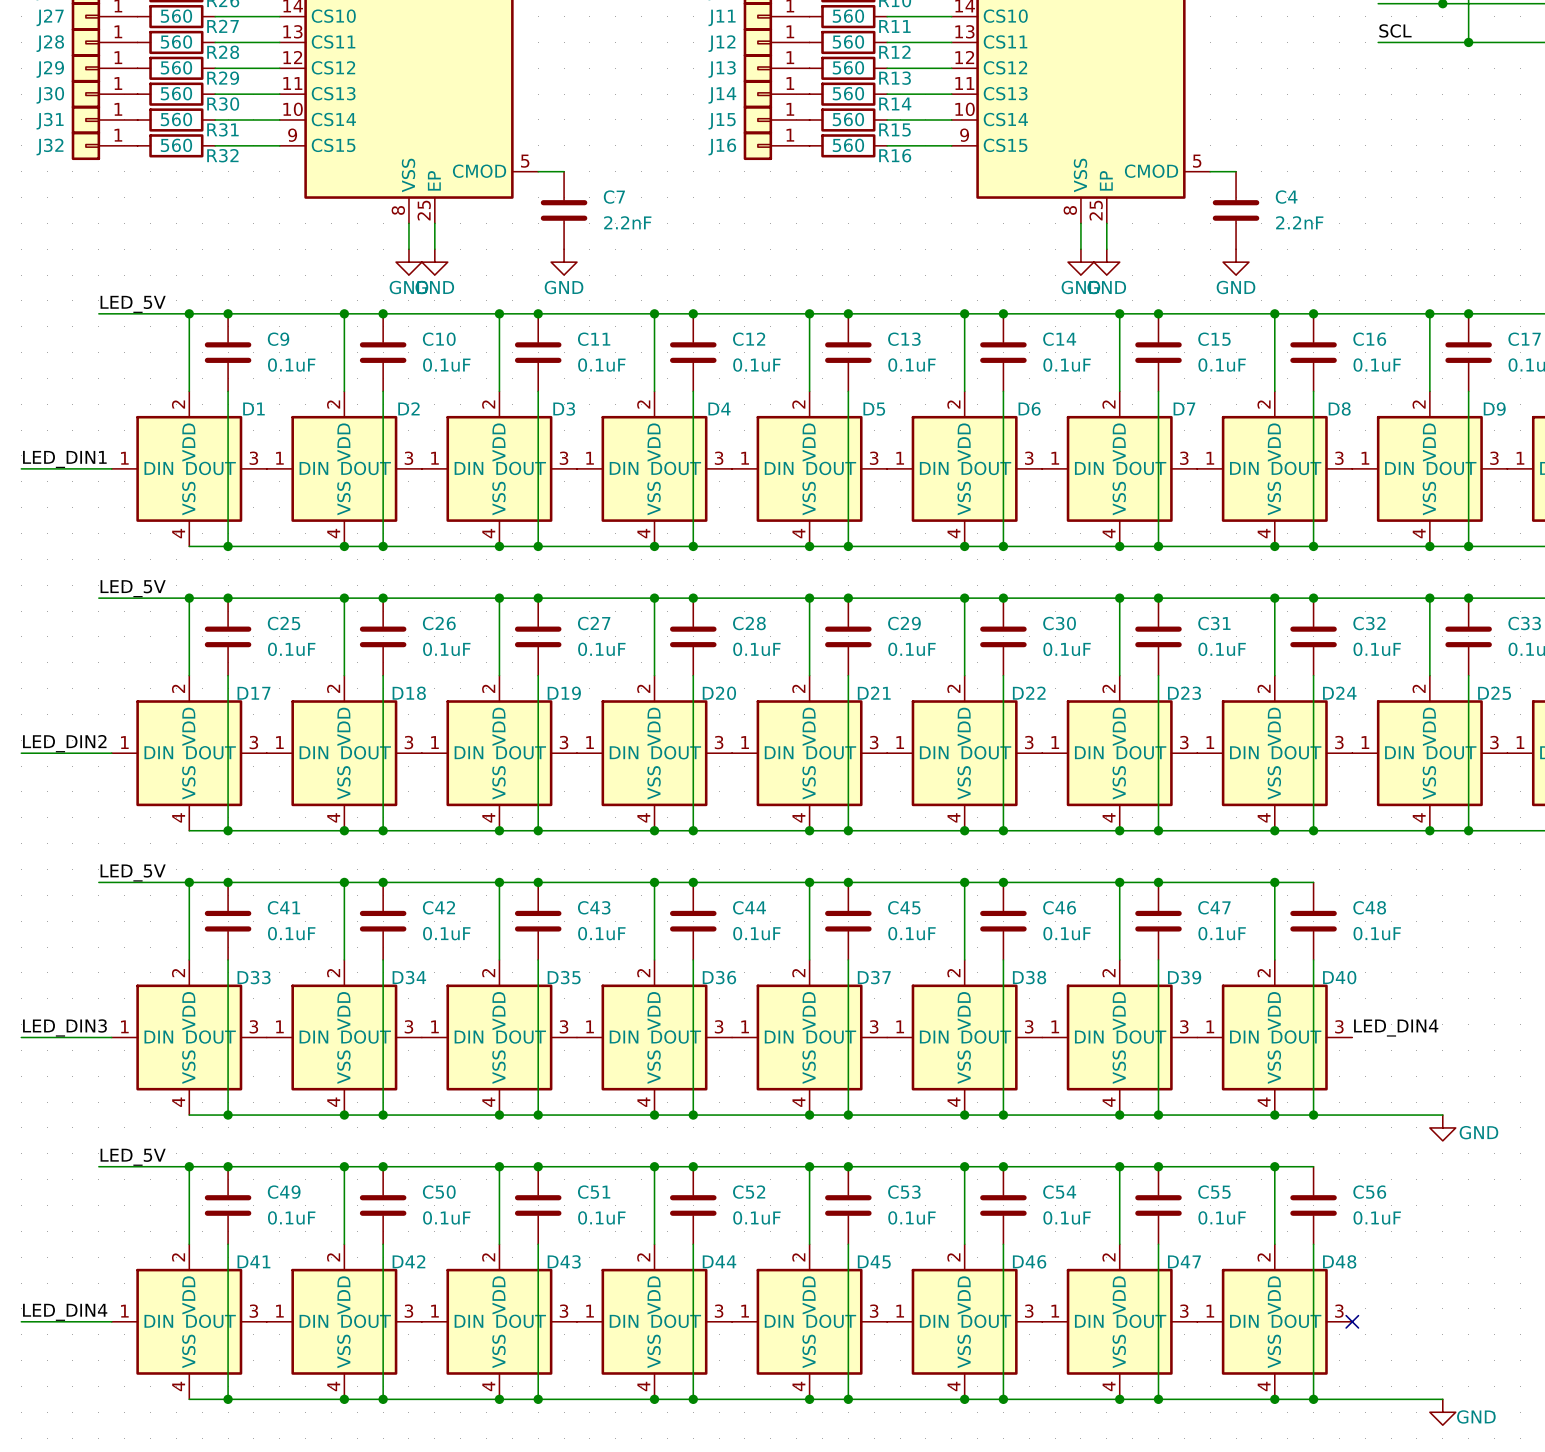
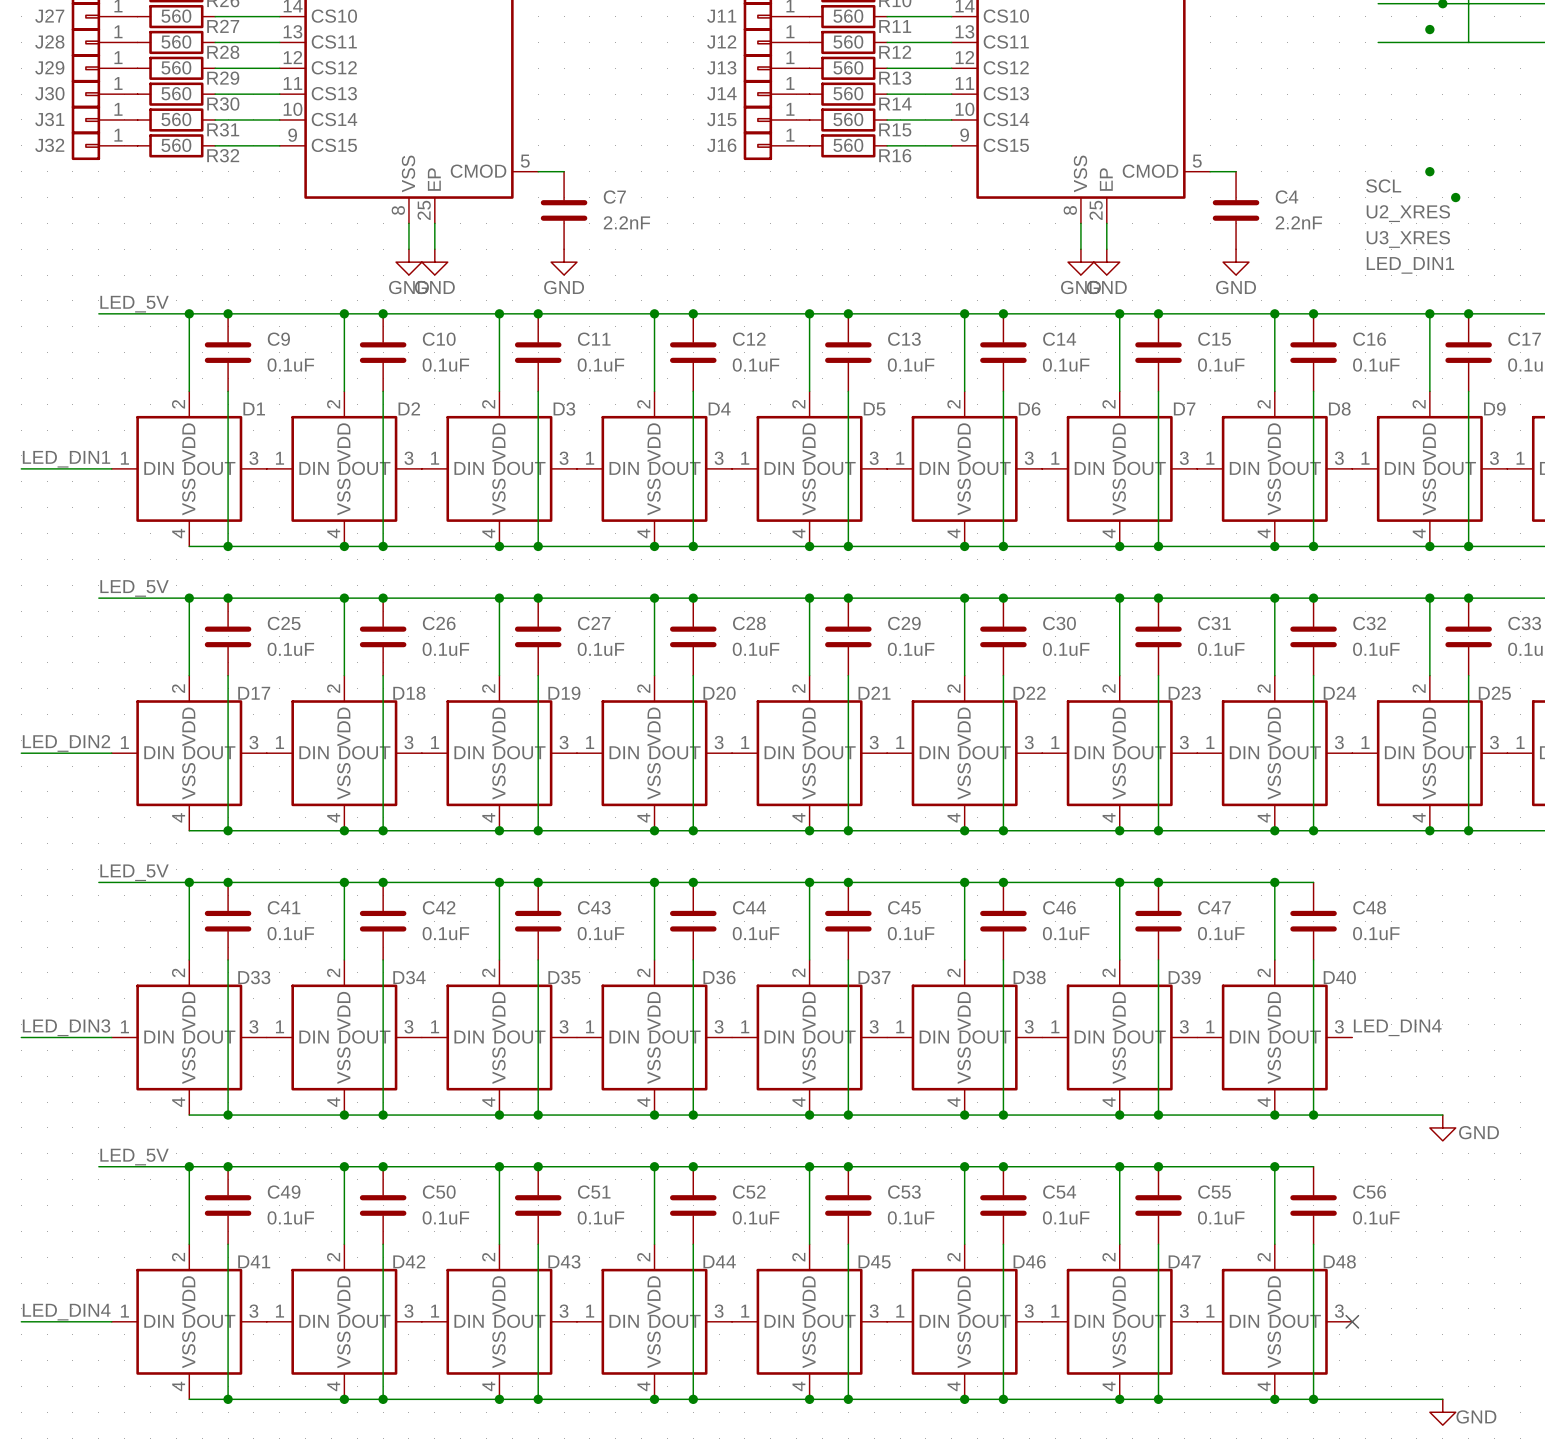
label position: SCL (1395, 30) -> SCL (1383, 185)
junction position: (1468, 42) -> (1429, 29)
junction: none -> (1429, 171)
junction: none -> (1455, 197)
label: none -> U2_XRES (1408, 213)
label: none -> U3_XRES (1408, 239)
label: none -> LED_DIN1 (1410, 265)

